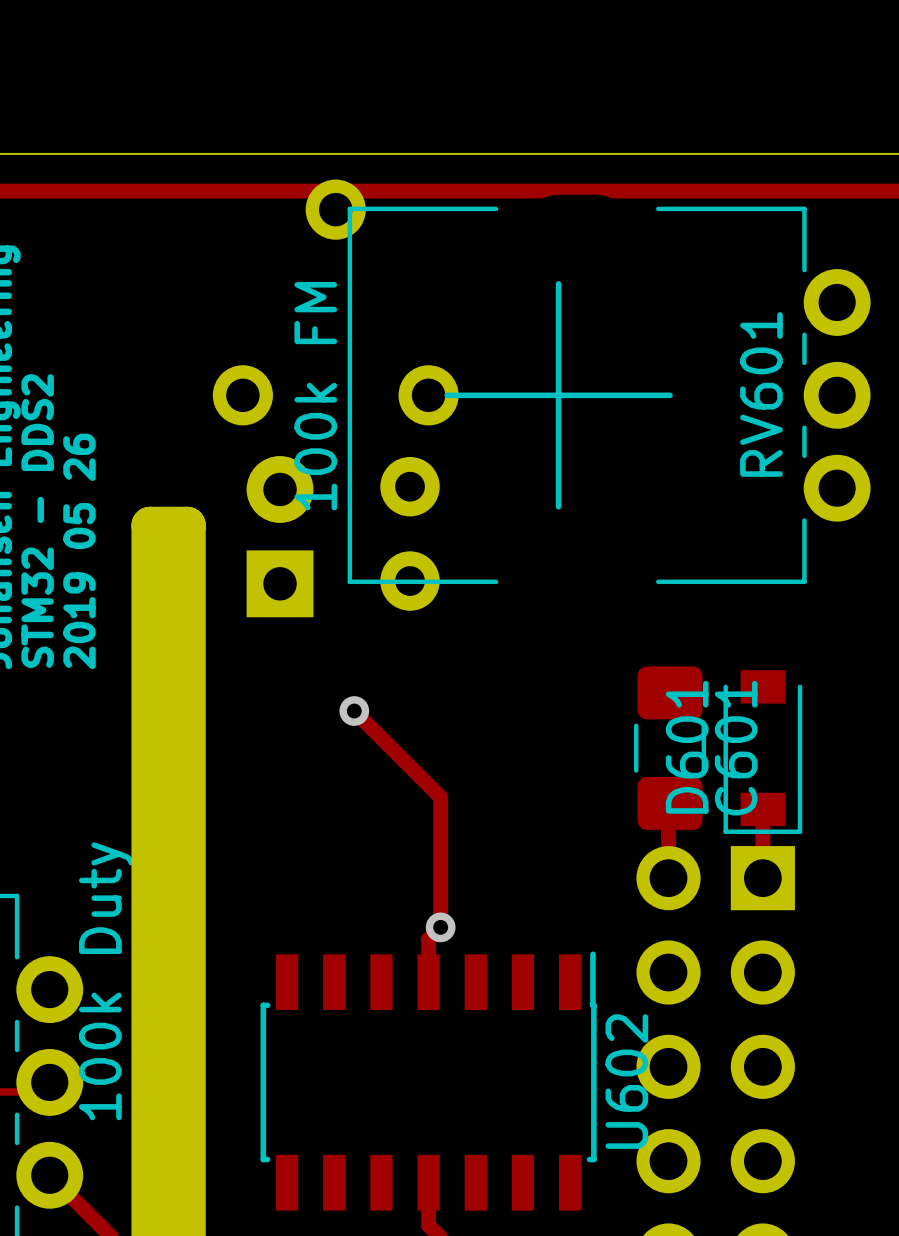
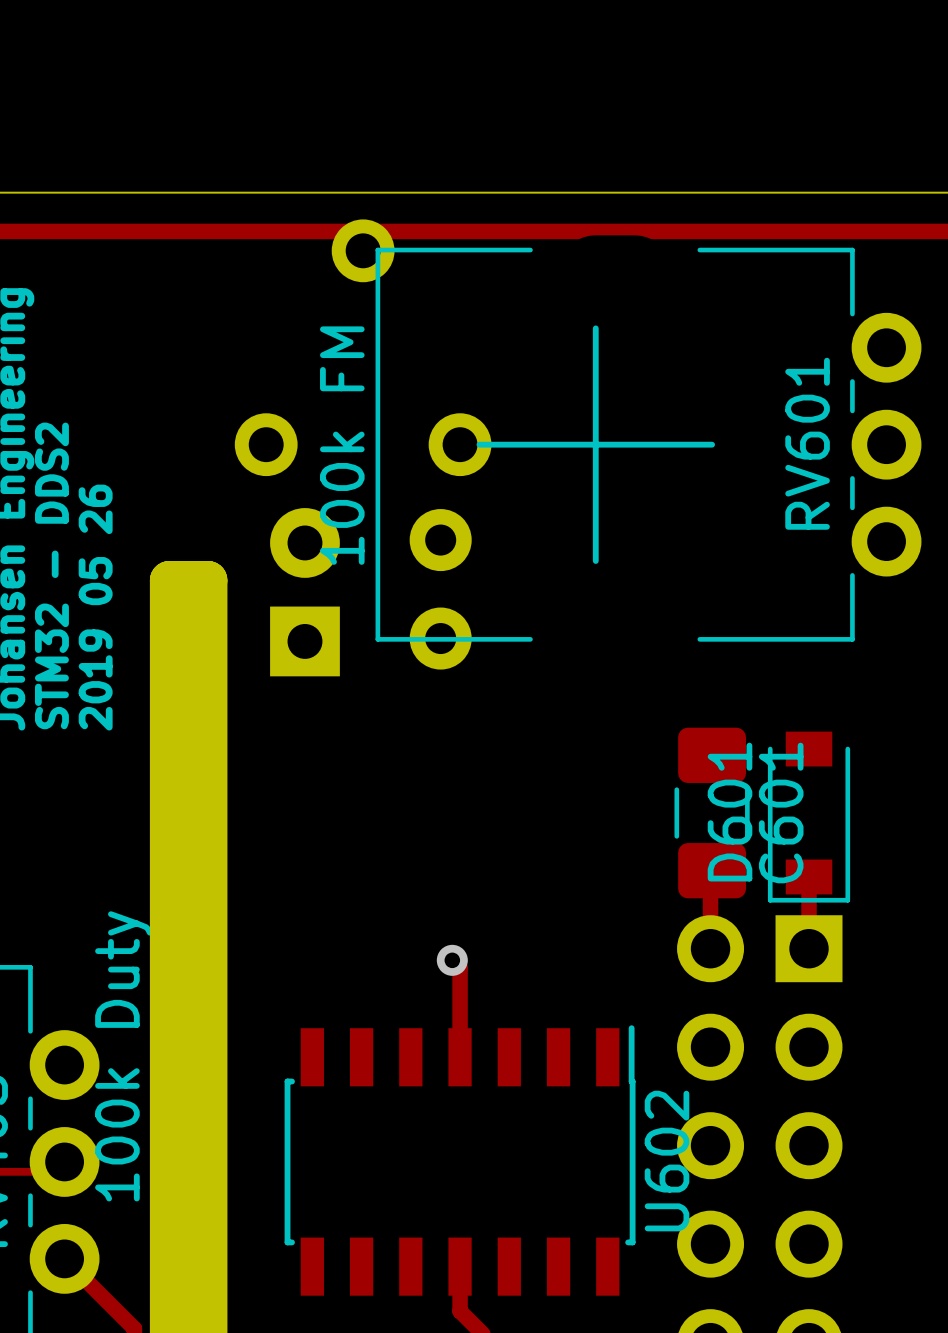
track: (354, 711) (440, 797) (440, 927) (428, 939) -> (452, 960) (460, 968) (460, 1012)
via: (354, 711) -> none
via position: (440, 927) -> (452, 960)

